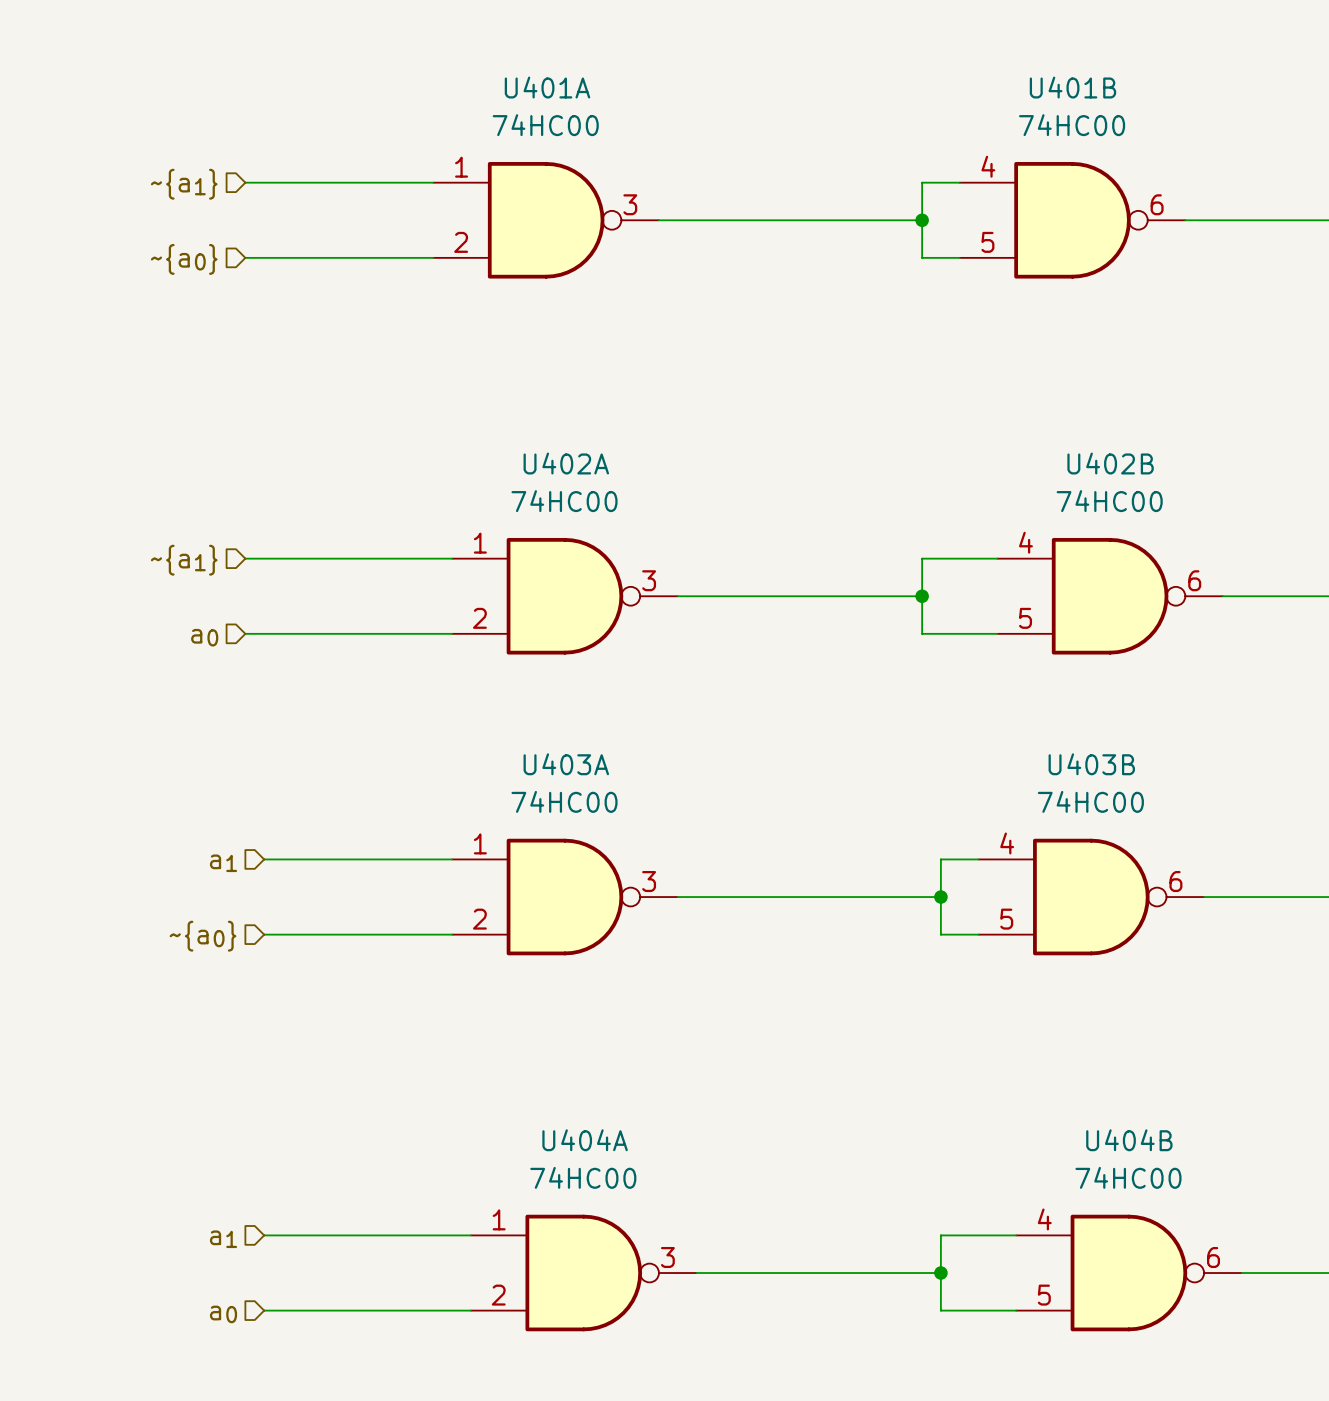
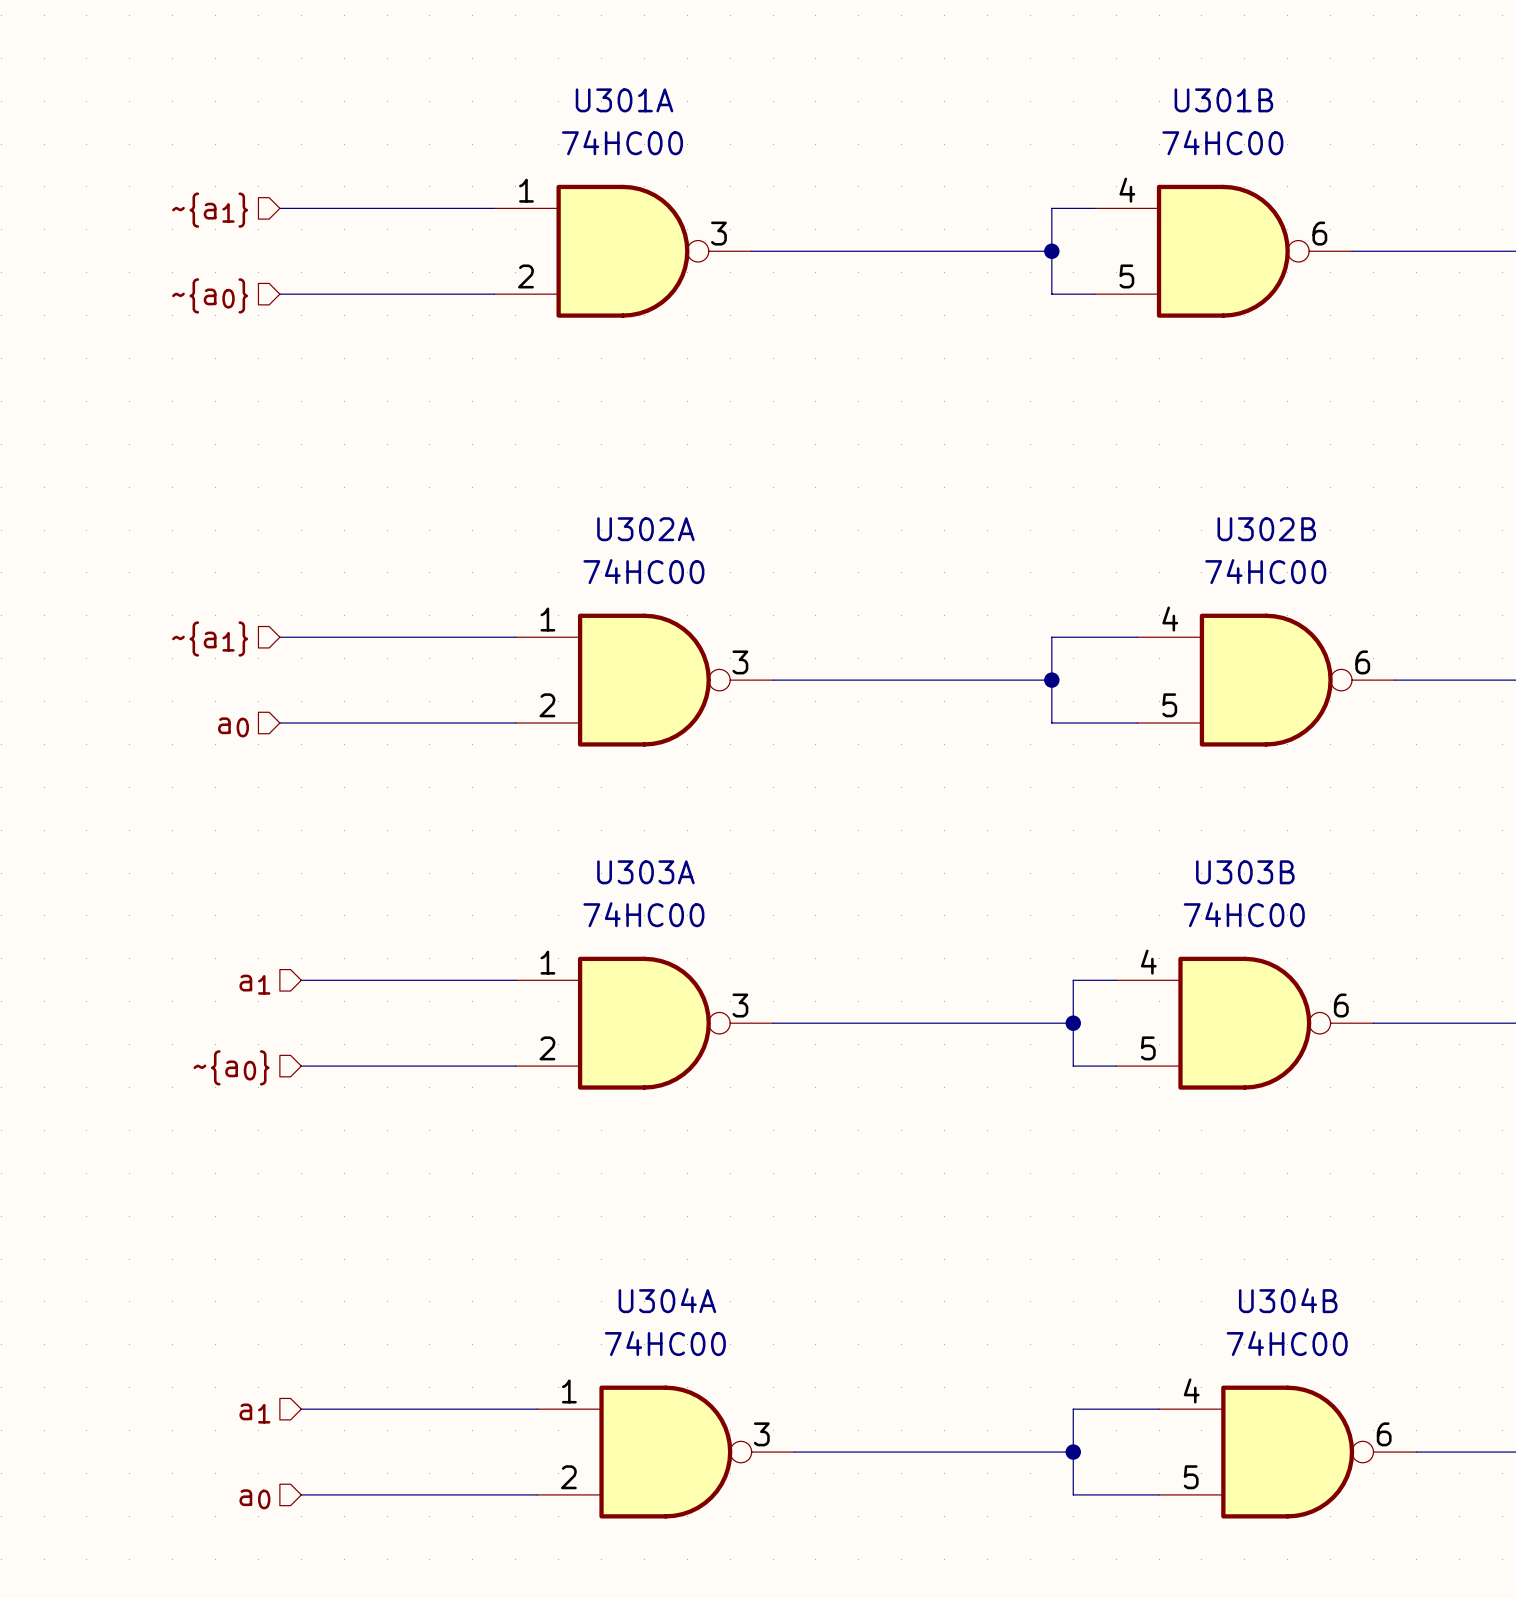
U401A name: U401A (547, 87) -> U301A (624, 100)
U401B name: U401B (1072, 87) -> U301B (1223, 100)
U402A name: U402A (566, 463) -> U302A (645, 529)
U402B name: U402B (1110, 463) -> U302B (1266, 529)
U403A name: U403A (566, 764) -> U303A (645, 872)
U403B name: U403B (1091, 764) -> U303B (1245, 872)
U404A name: U404A (585, 1140) -> U304A (667, 1300)
U404B name: U404B (1129, 1140) -> U304B (1288, 1300)

